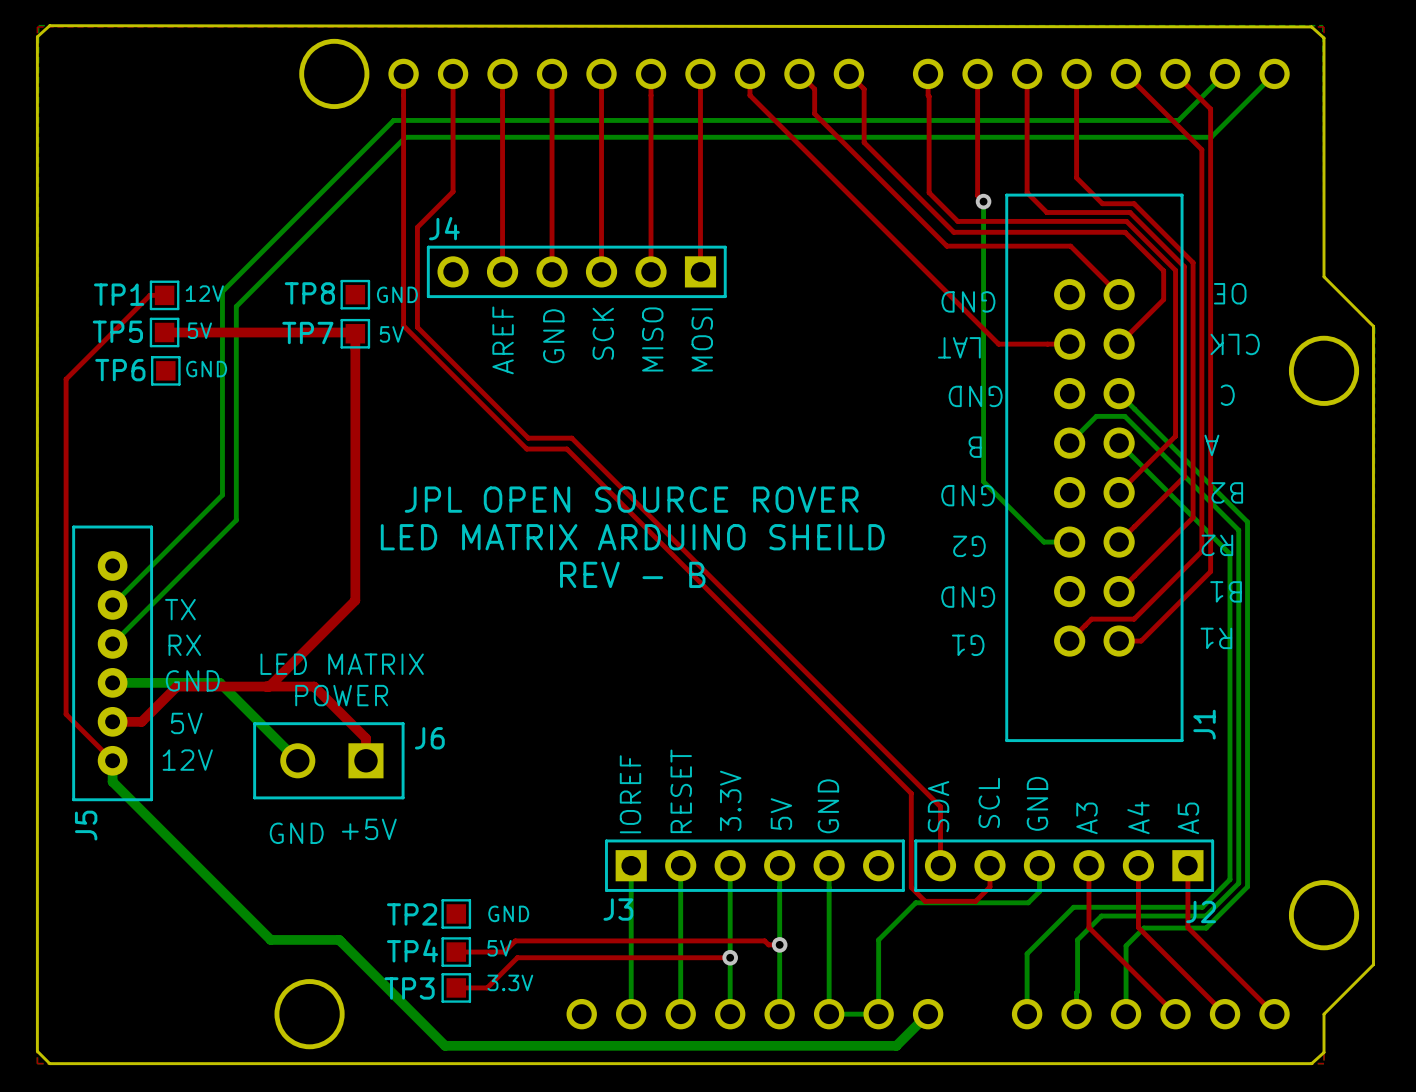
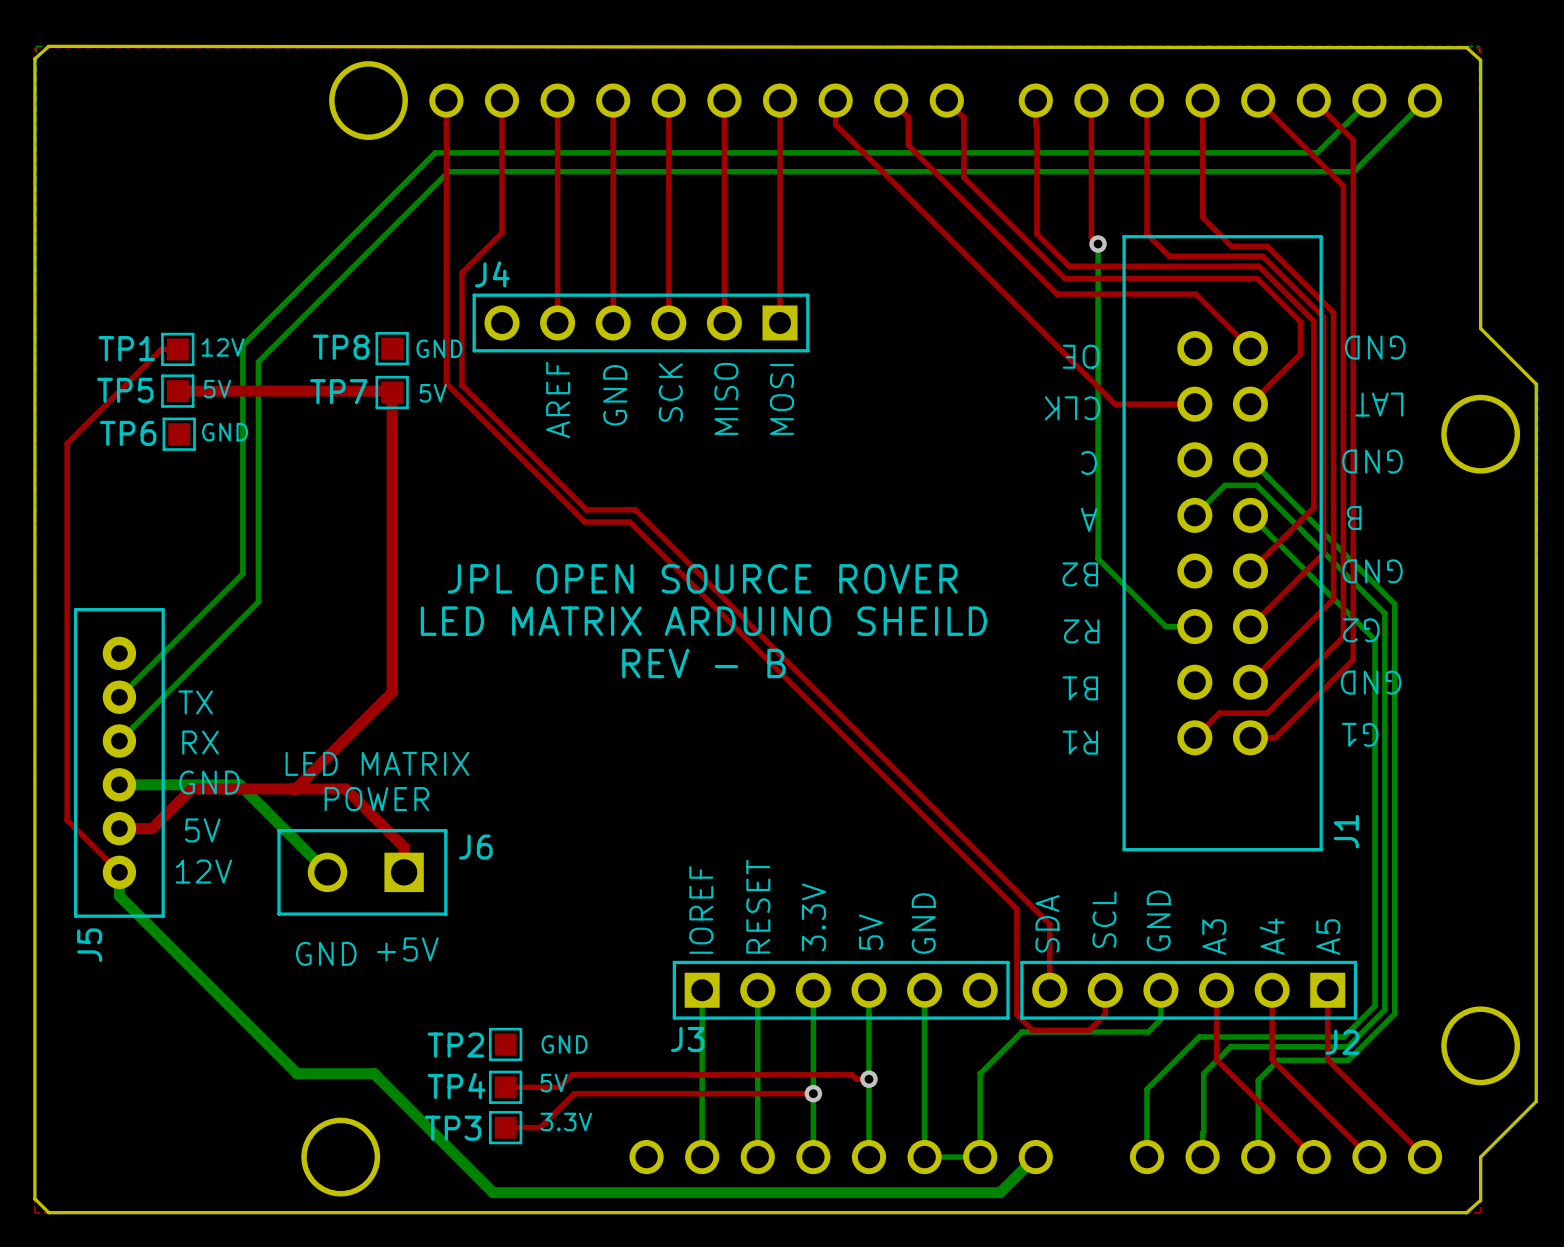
text: OE (1230, 293) -> GND (1375, 347)
text: GND (968, 301) -> OE (1081, 356)
text: CLK (1235, 344) -> LAT (1379, 404)
text: LAT (959, 347) -> CLK (1072, 408)
text: C (1227, 395) -> GND (1372, 461)
text: GND (975, 396) -> C (1089, 462)
text: A (1211, 445) -> B (1354, 517)
text: B (975, 447) -> A (1089, 519)
text: B2 (1227, 492) -> GND (1372, 571)
text: GND (968, 495) -> B2 (1080, 574)
text: R2 (1217, 545) -> G2 (1361, 630)
text: G2 (969, 546) -> R2 (1081, 631)
text: B1 (1226, 591) -> GND (1371, 682)
text: GND (968, 597) -> B1 (1080, 688)
text: R1 (1216, 638) -> G1 (1360, 734)
text: G1 (968, 645) -> R1 (1080, 742)

